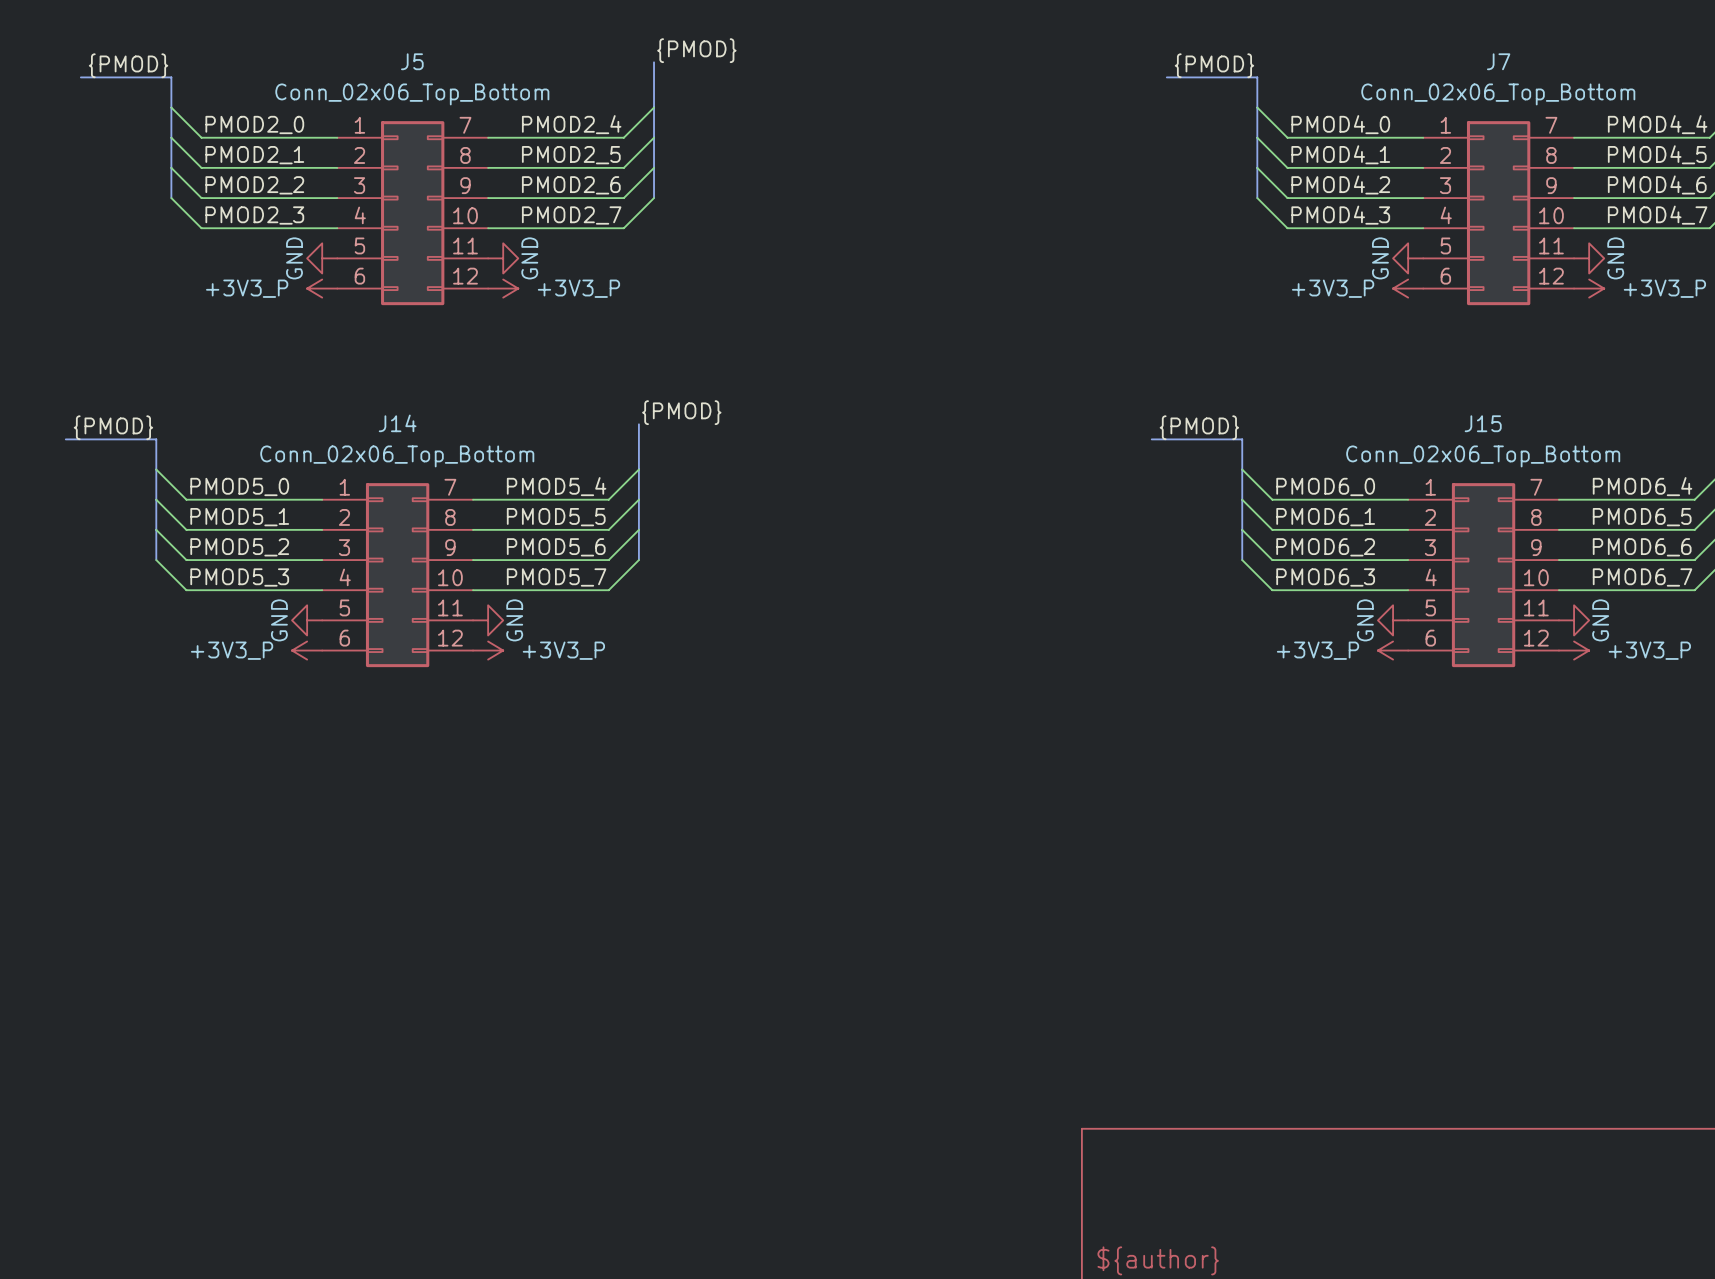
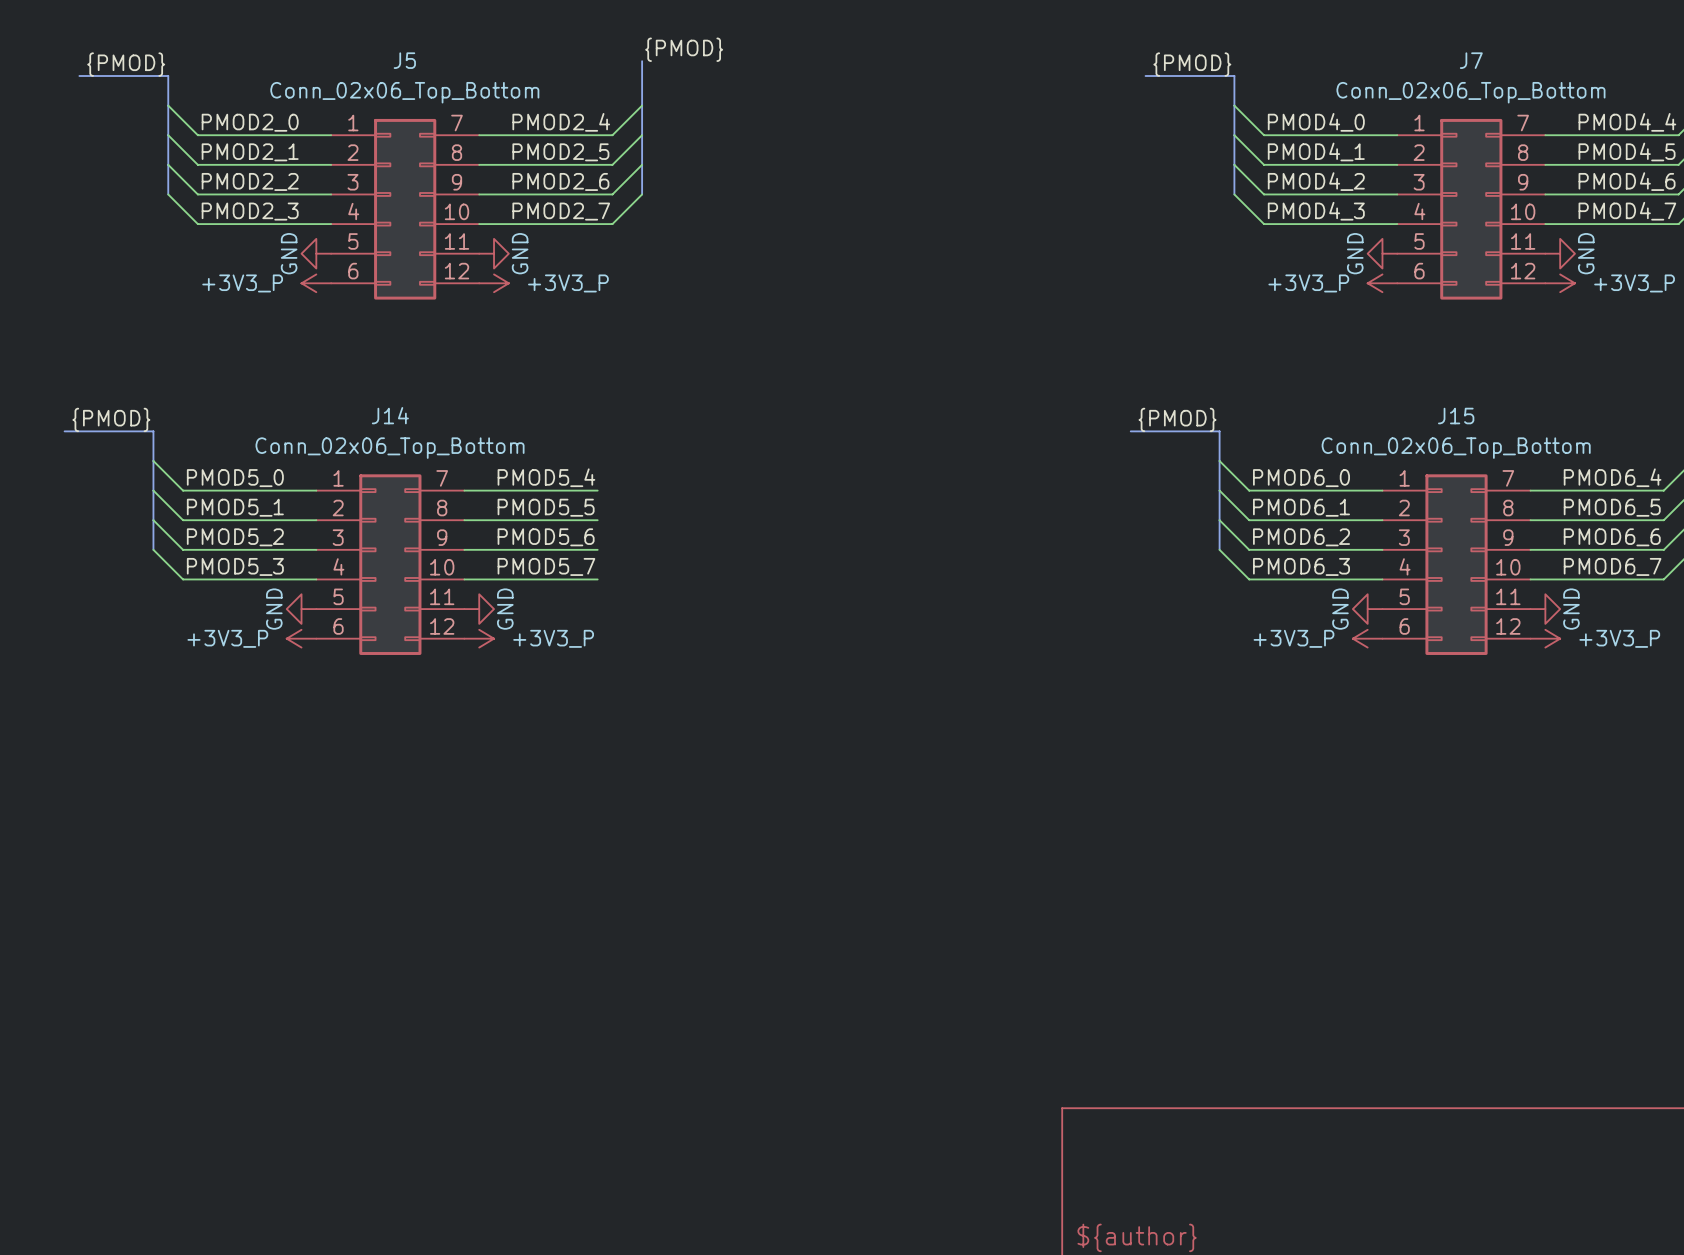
label: {PMOD} (681, 412) -> none
bus: (638, 424) (638, 560) -> none
wire: (638, 469) (608, 499) -> none
wire: (638, 499) (608, 529) -> none
wire: (638, 529) (608, 560) -> none
wire: (638, 560) (608, 590) -> none

